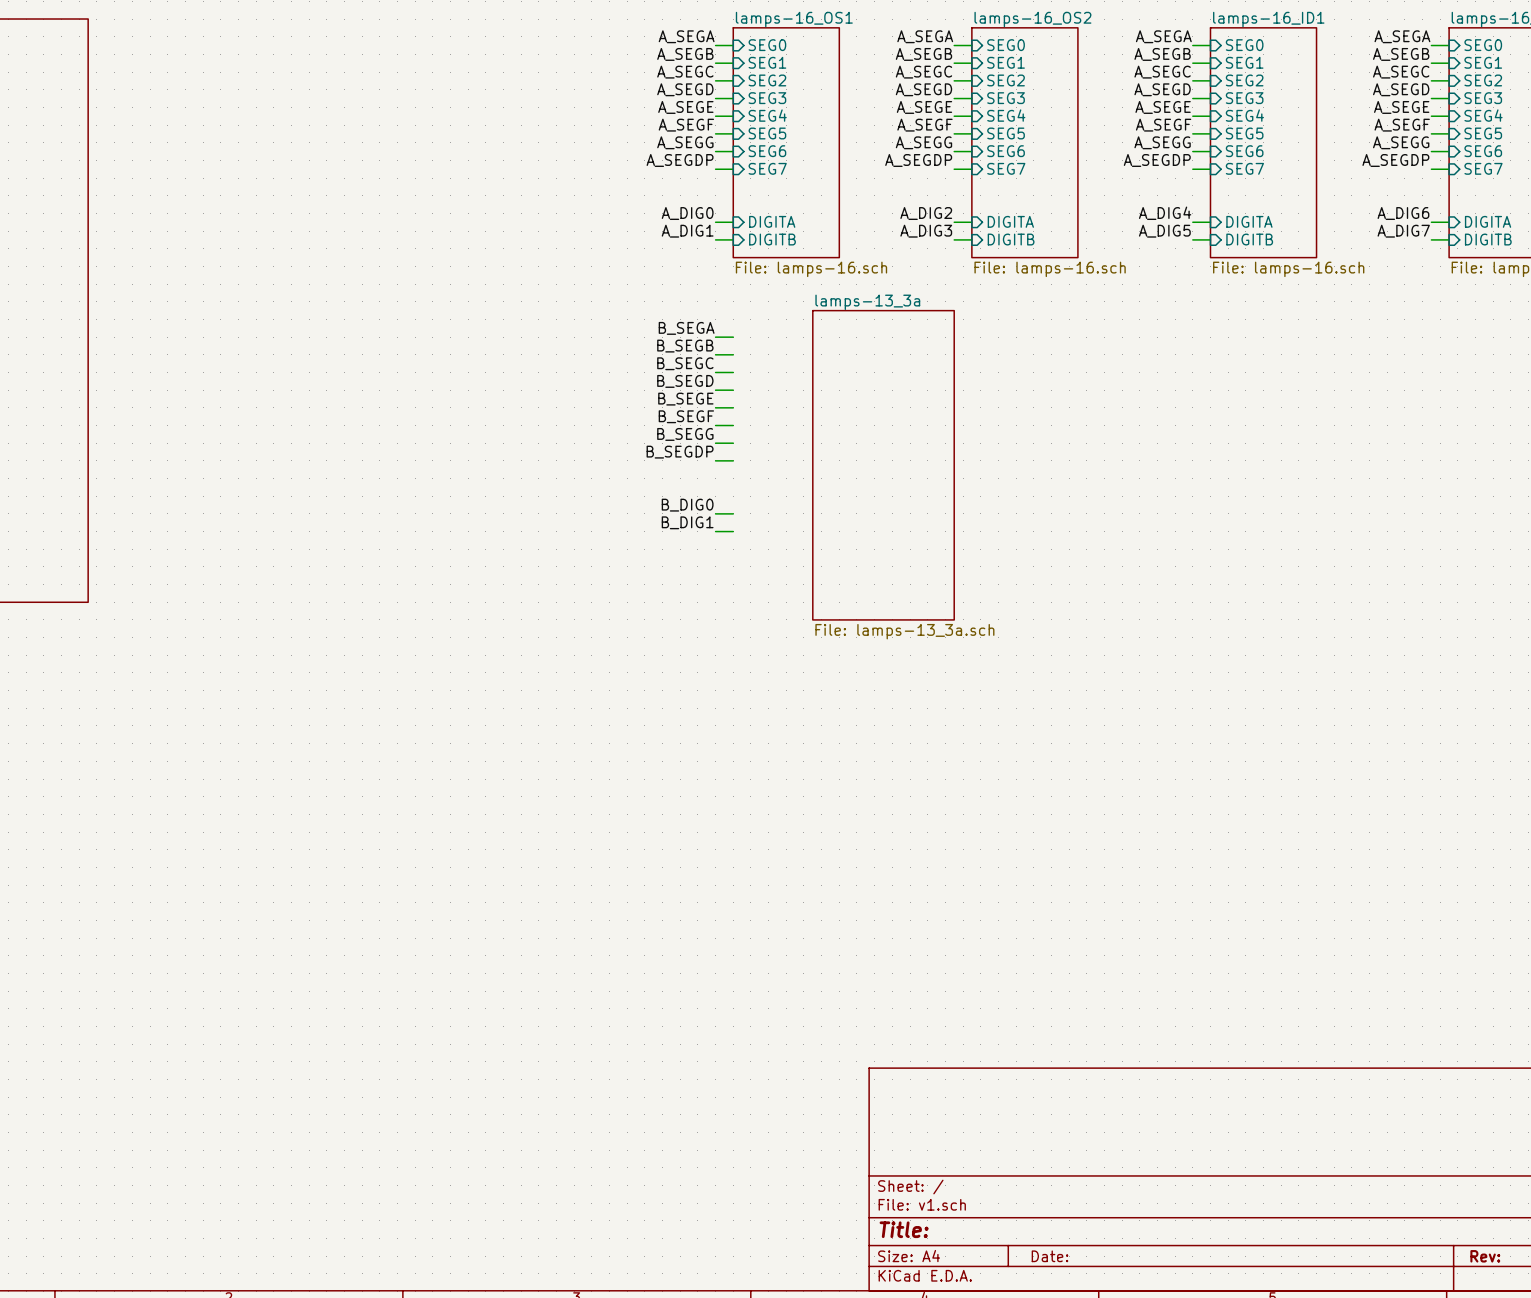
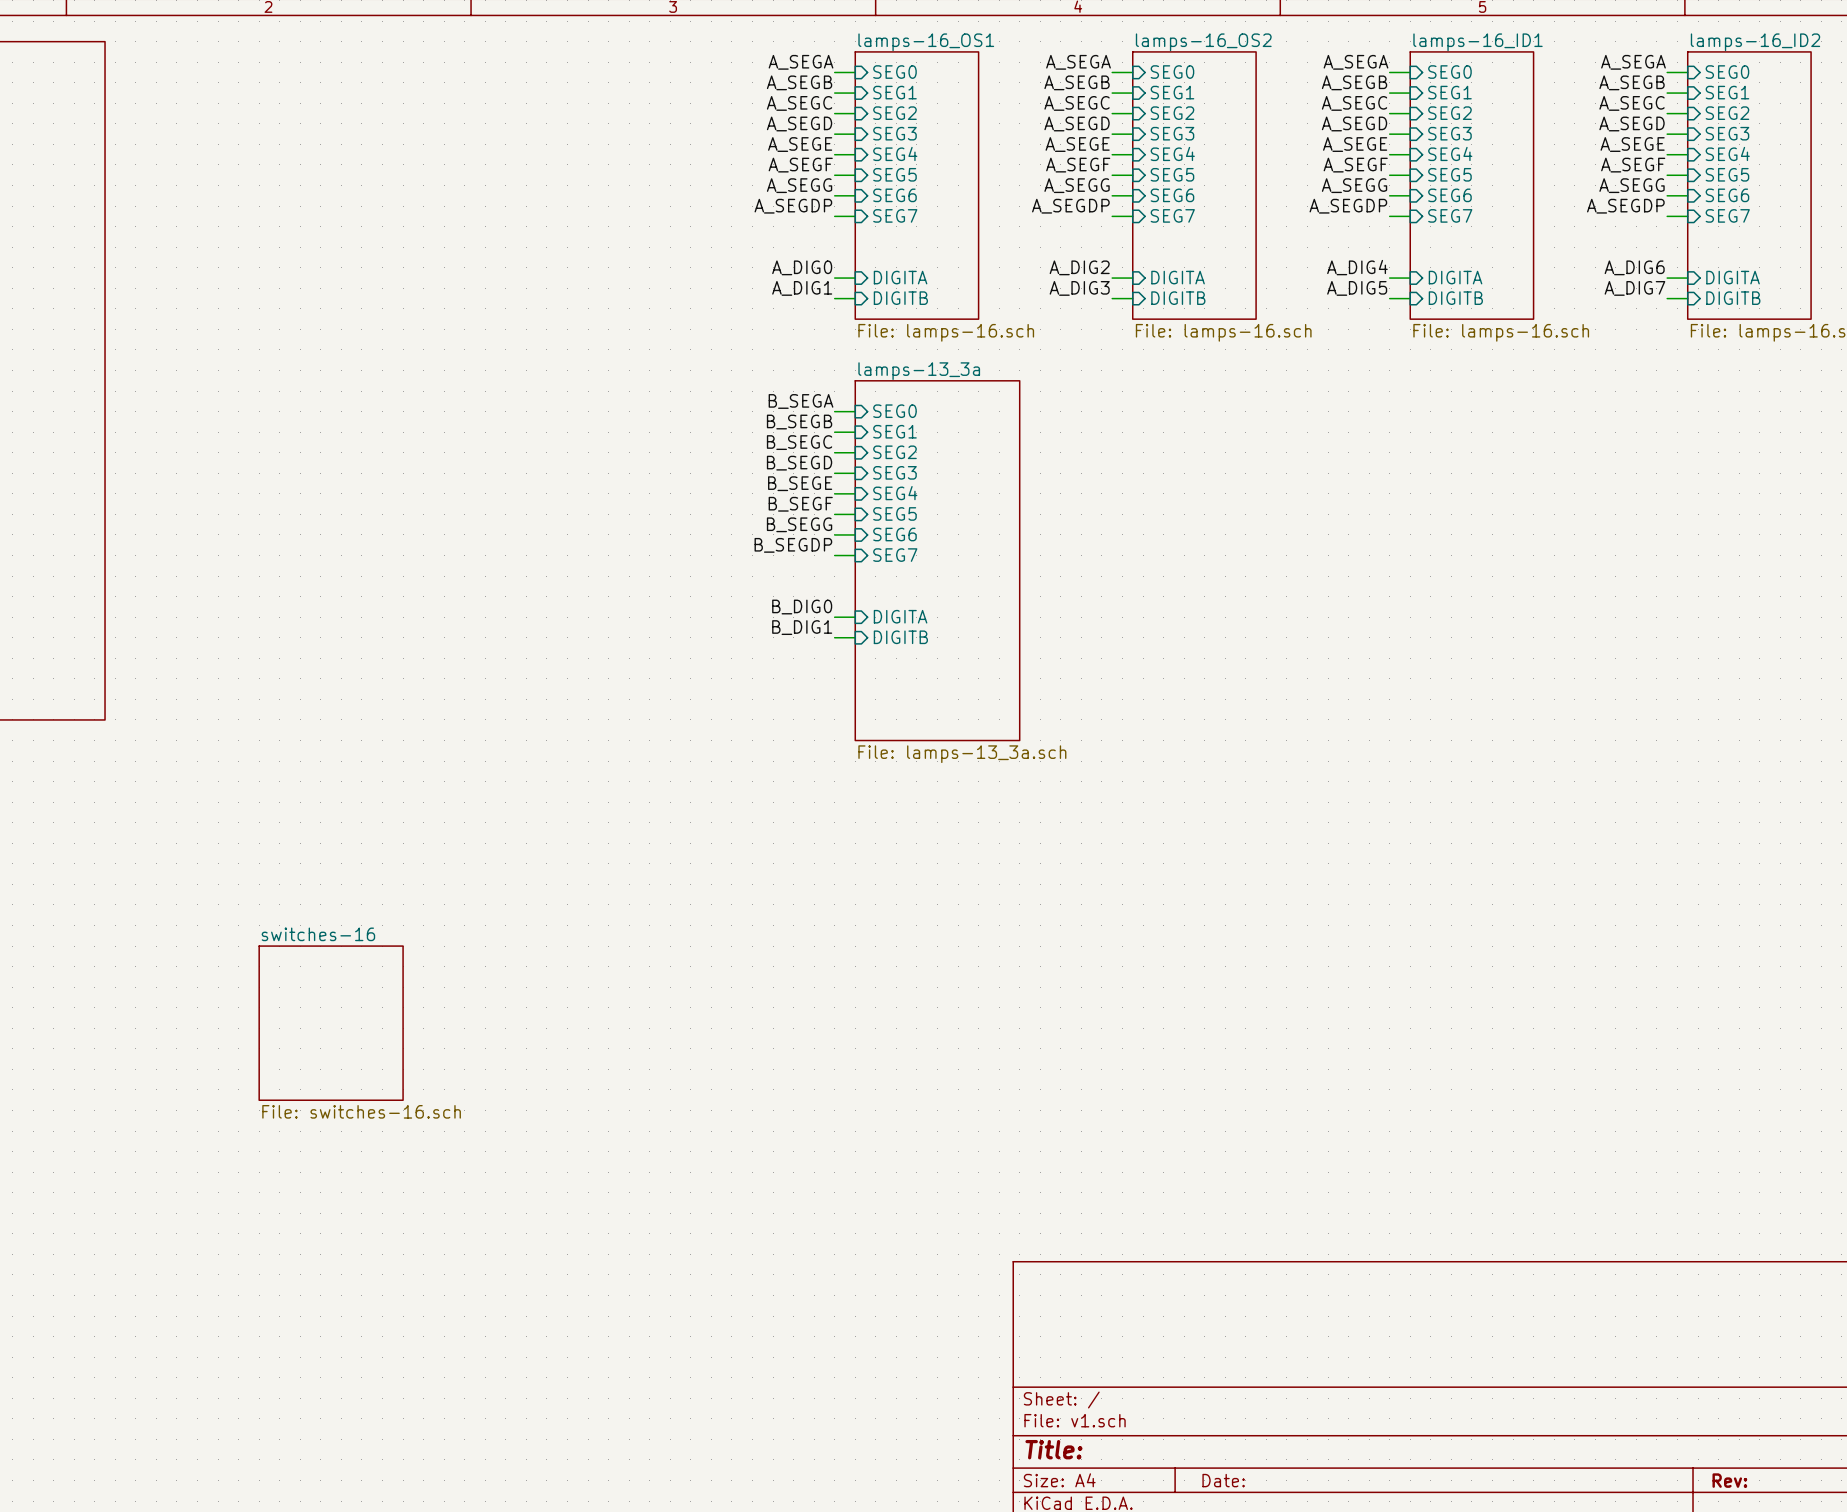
sheet pin: none -> SEG0 (894, 411)
sheet pin: none -> SEG1 (894, 431)
sheet pin: none -> SEG2 (894, 452)
sheet pin: none -> SEG3 (894, 472)
sheet pin: none -> SEG4 (895, 493)
sheet pin: none -> SEG5 (894, 513)
sheet pin: none -> SEG6 (894, 534)
sheet pin: none -> SEG7 (895, 555)
sheet lamps-13_3a position: (883, 465) -> (937, 560)
sheet pin: none -> DIGITA (900, 616)
sheet pin: none -> DIGITB (900, 637)
sheet switches-16: none -> File: switches-16.sch (331, 1023)

